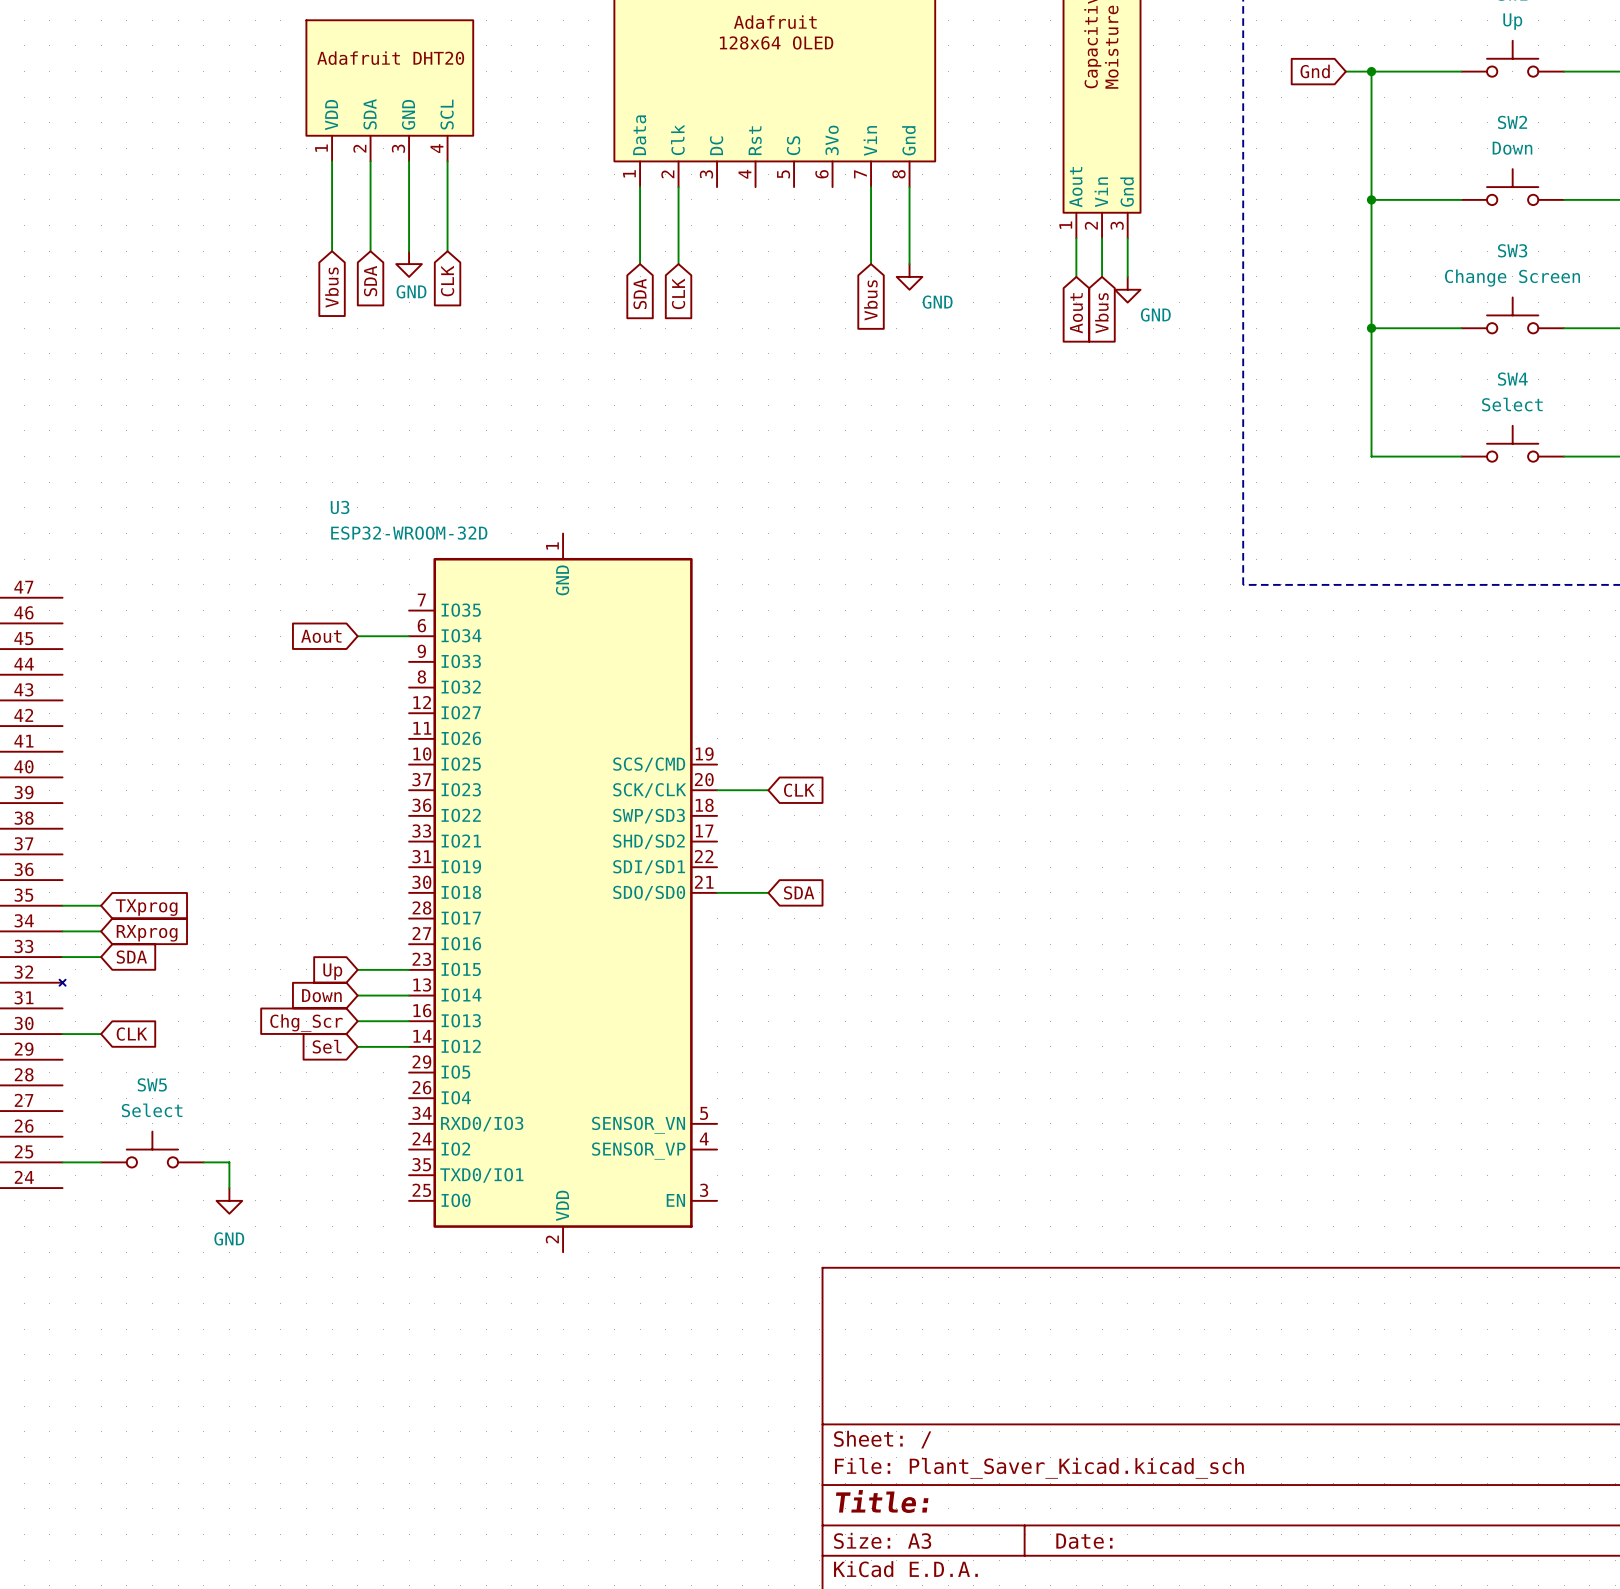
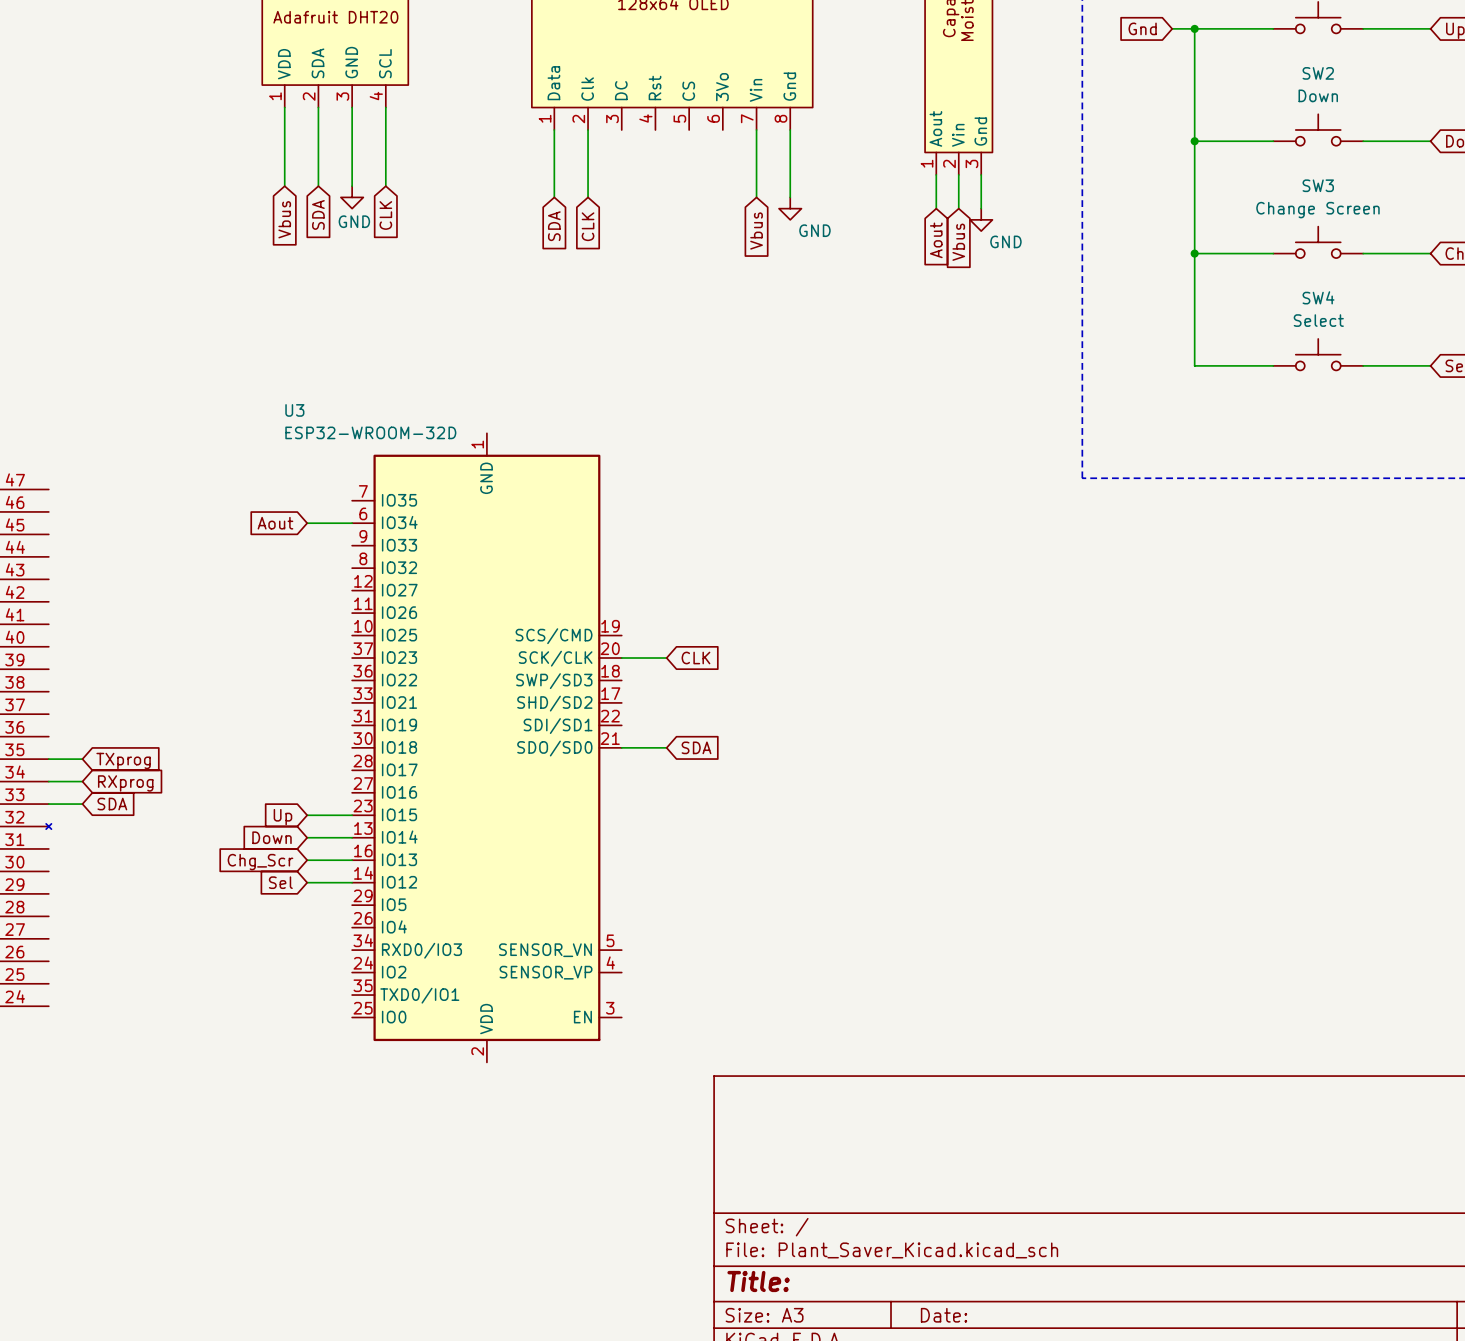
wire: (62, 1034) (101, 1034) -> none
global label: CLK (131, 1034) -> none
SW5: Select (152, 1149) -> none
wire: (62, 1162) (101, 1162) -> none
wire: (203, 1162) (229, 1162) (229, 1188) -> none
power symbol: GND (229, 1200) -> none

